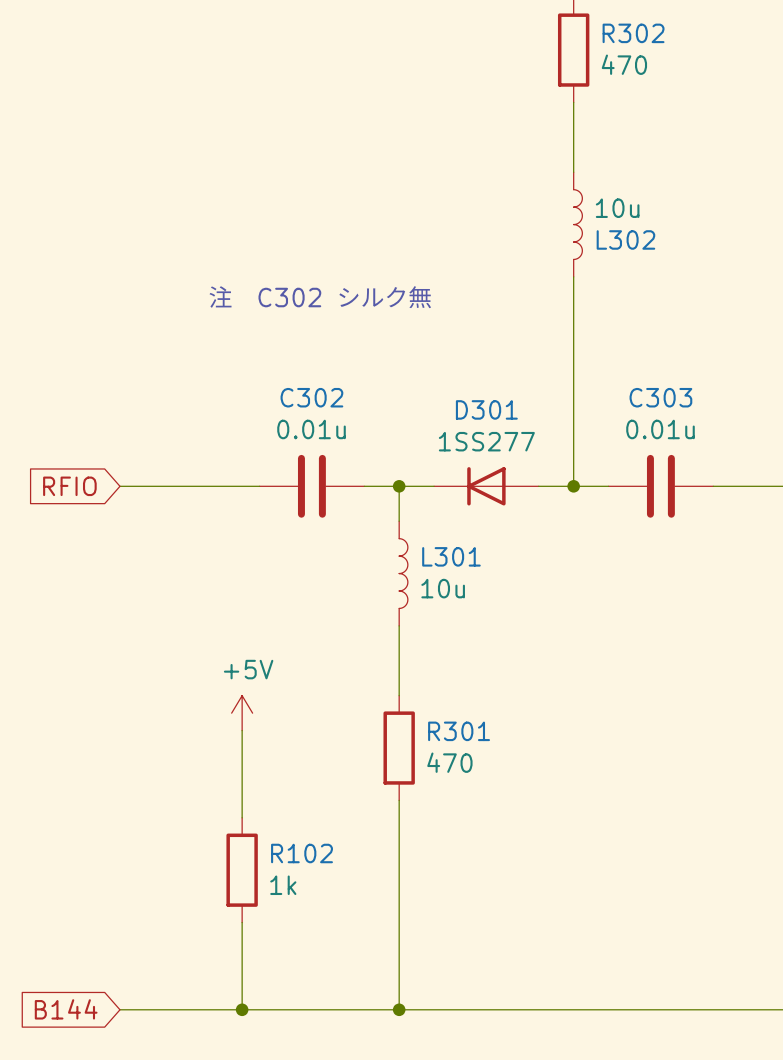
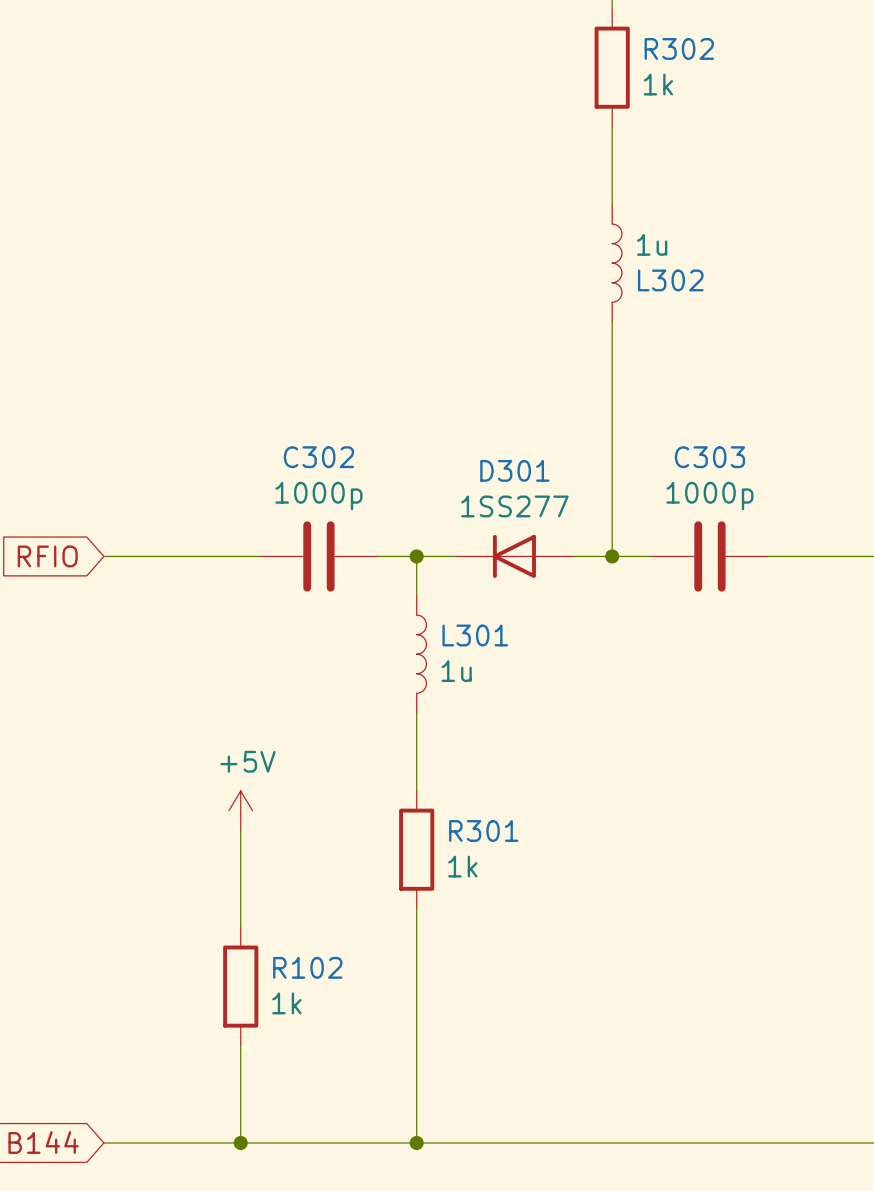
R302 value: 470 (624, 64) -> 1k (658, 84)
L302 value: 10u (617, 208) -> 1u (652, 244)
text: 注 C302 シルク無 (320, 297) -> none
C302 value: 0.01u (311, 429) -> 1000p (318, 496)
C303 value: 0.01u (660, 429) -> 1000p (709, 496)
L301 value: 10u (443, 588) -> 1u (456, 671)
R301 value: 470 (449, 762) -> 1k (462, 866)

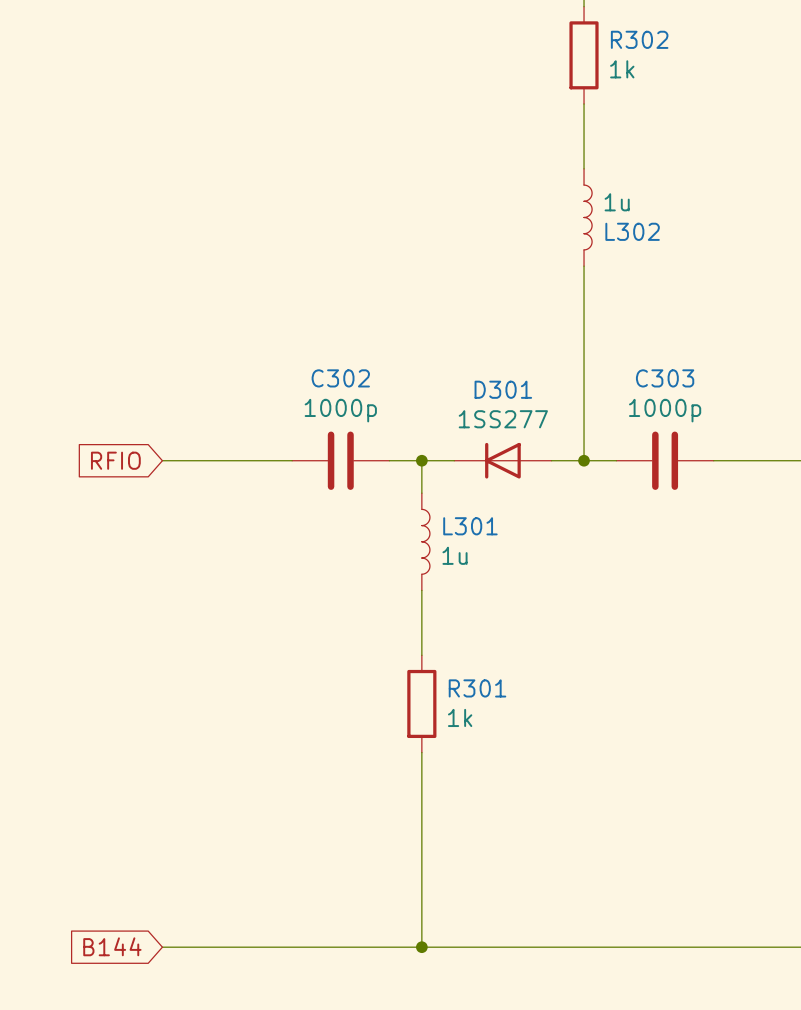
power symbol: +5V (240, 810) -> none
wire: (240, 830) (240, 927) -> none
R102: 1k (240, 986) -> none
wire: (240, 1045) (240, 1142) -> none
junction: (240, 1142) -> none

